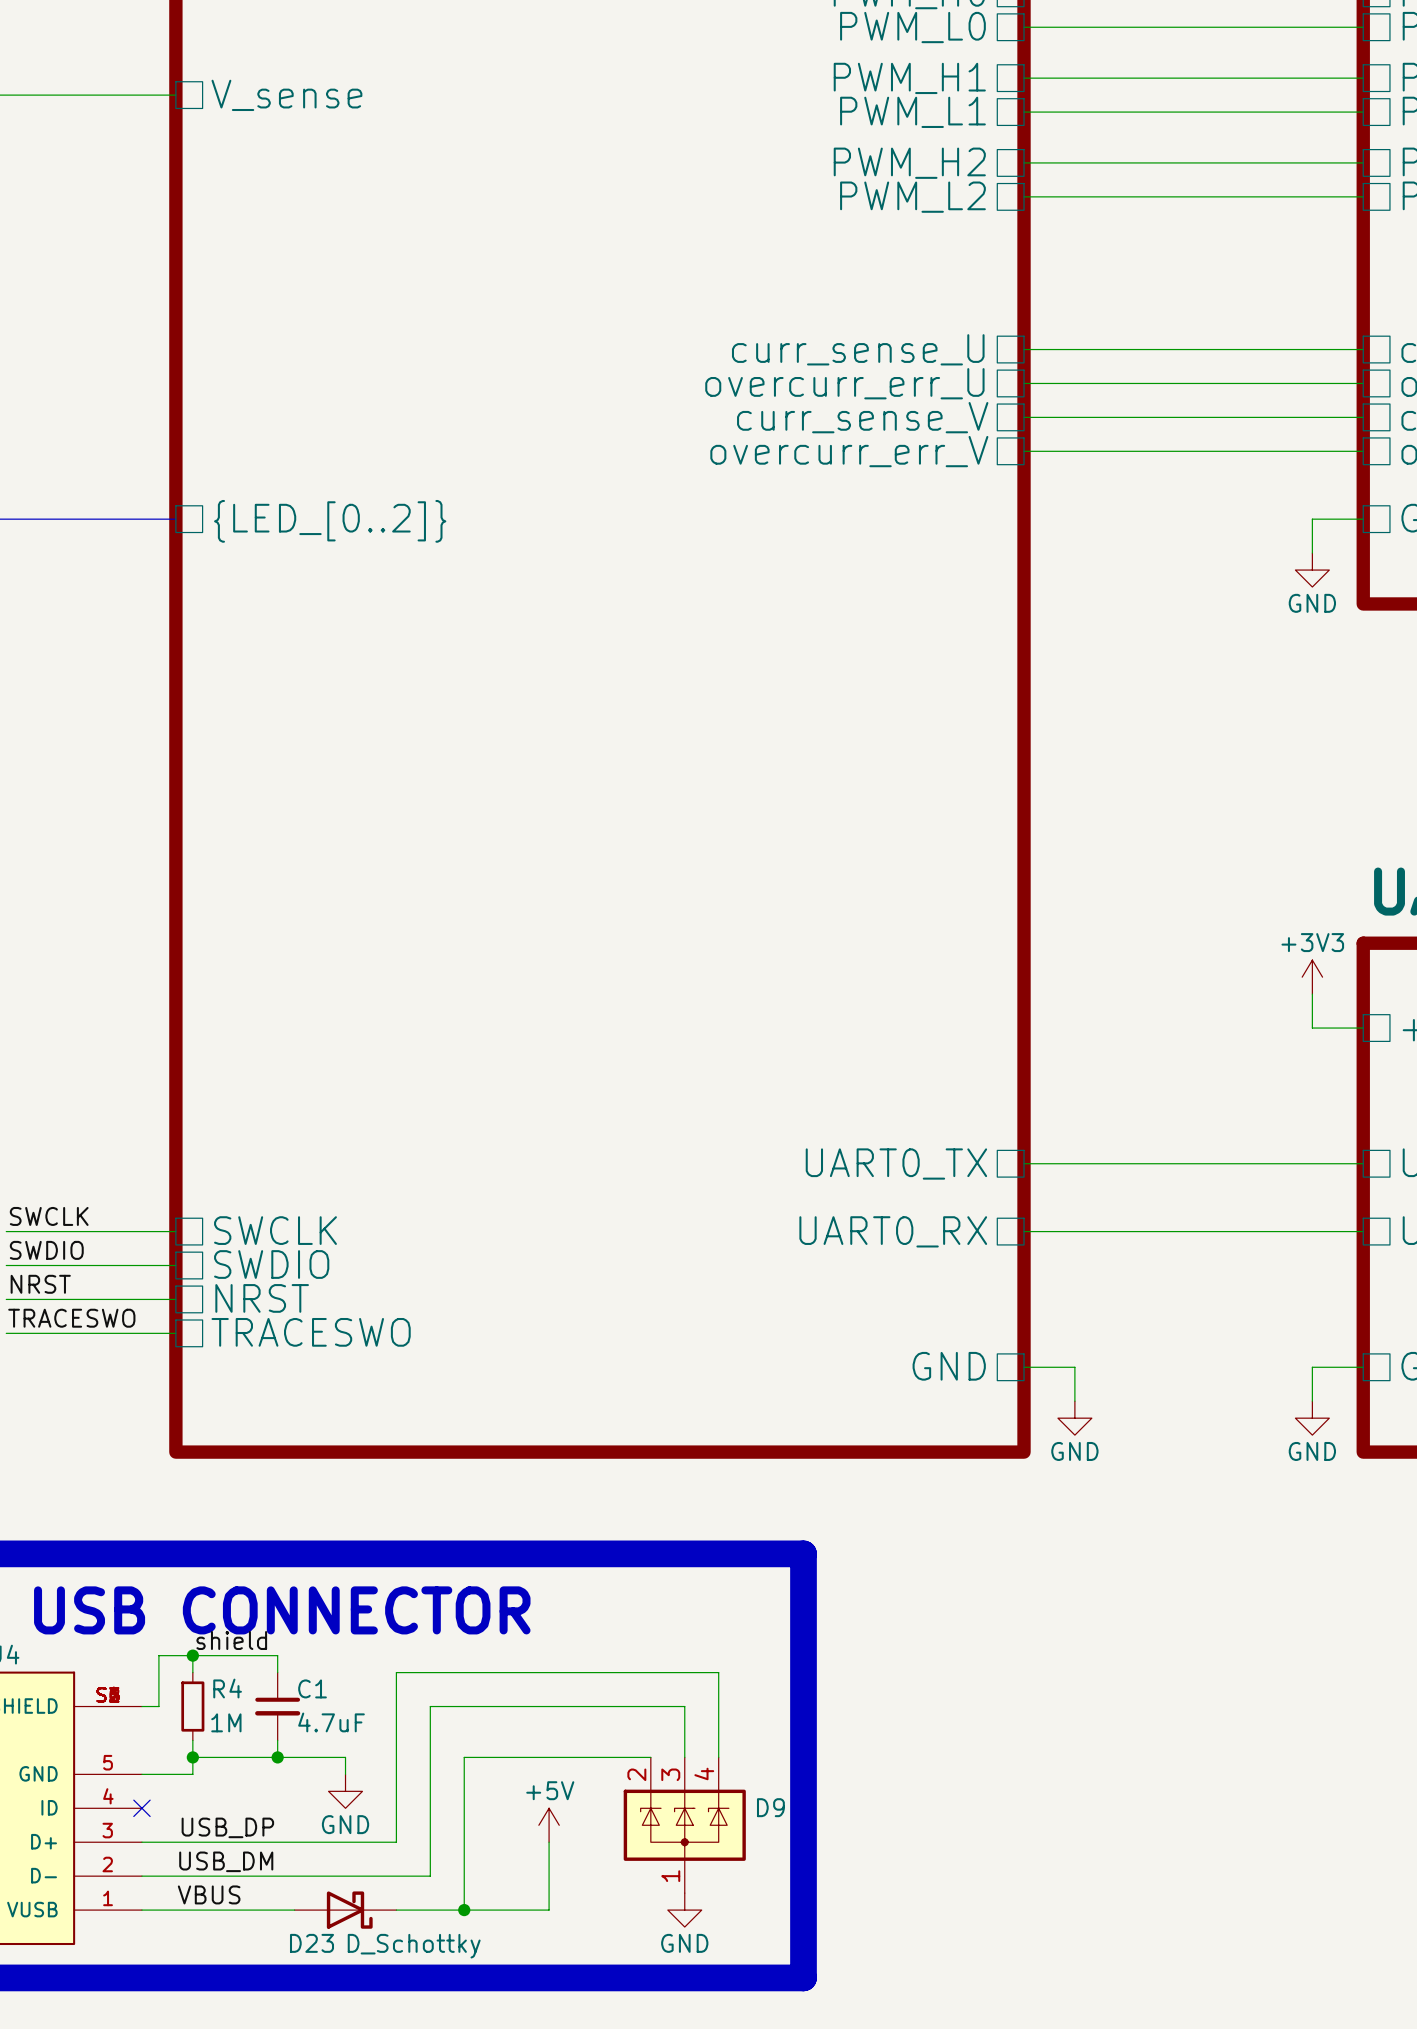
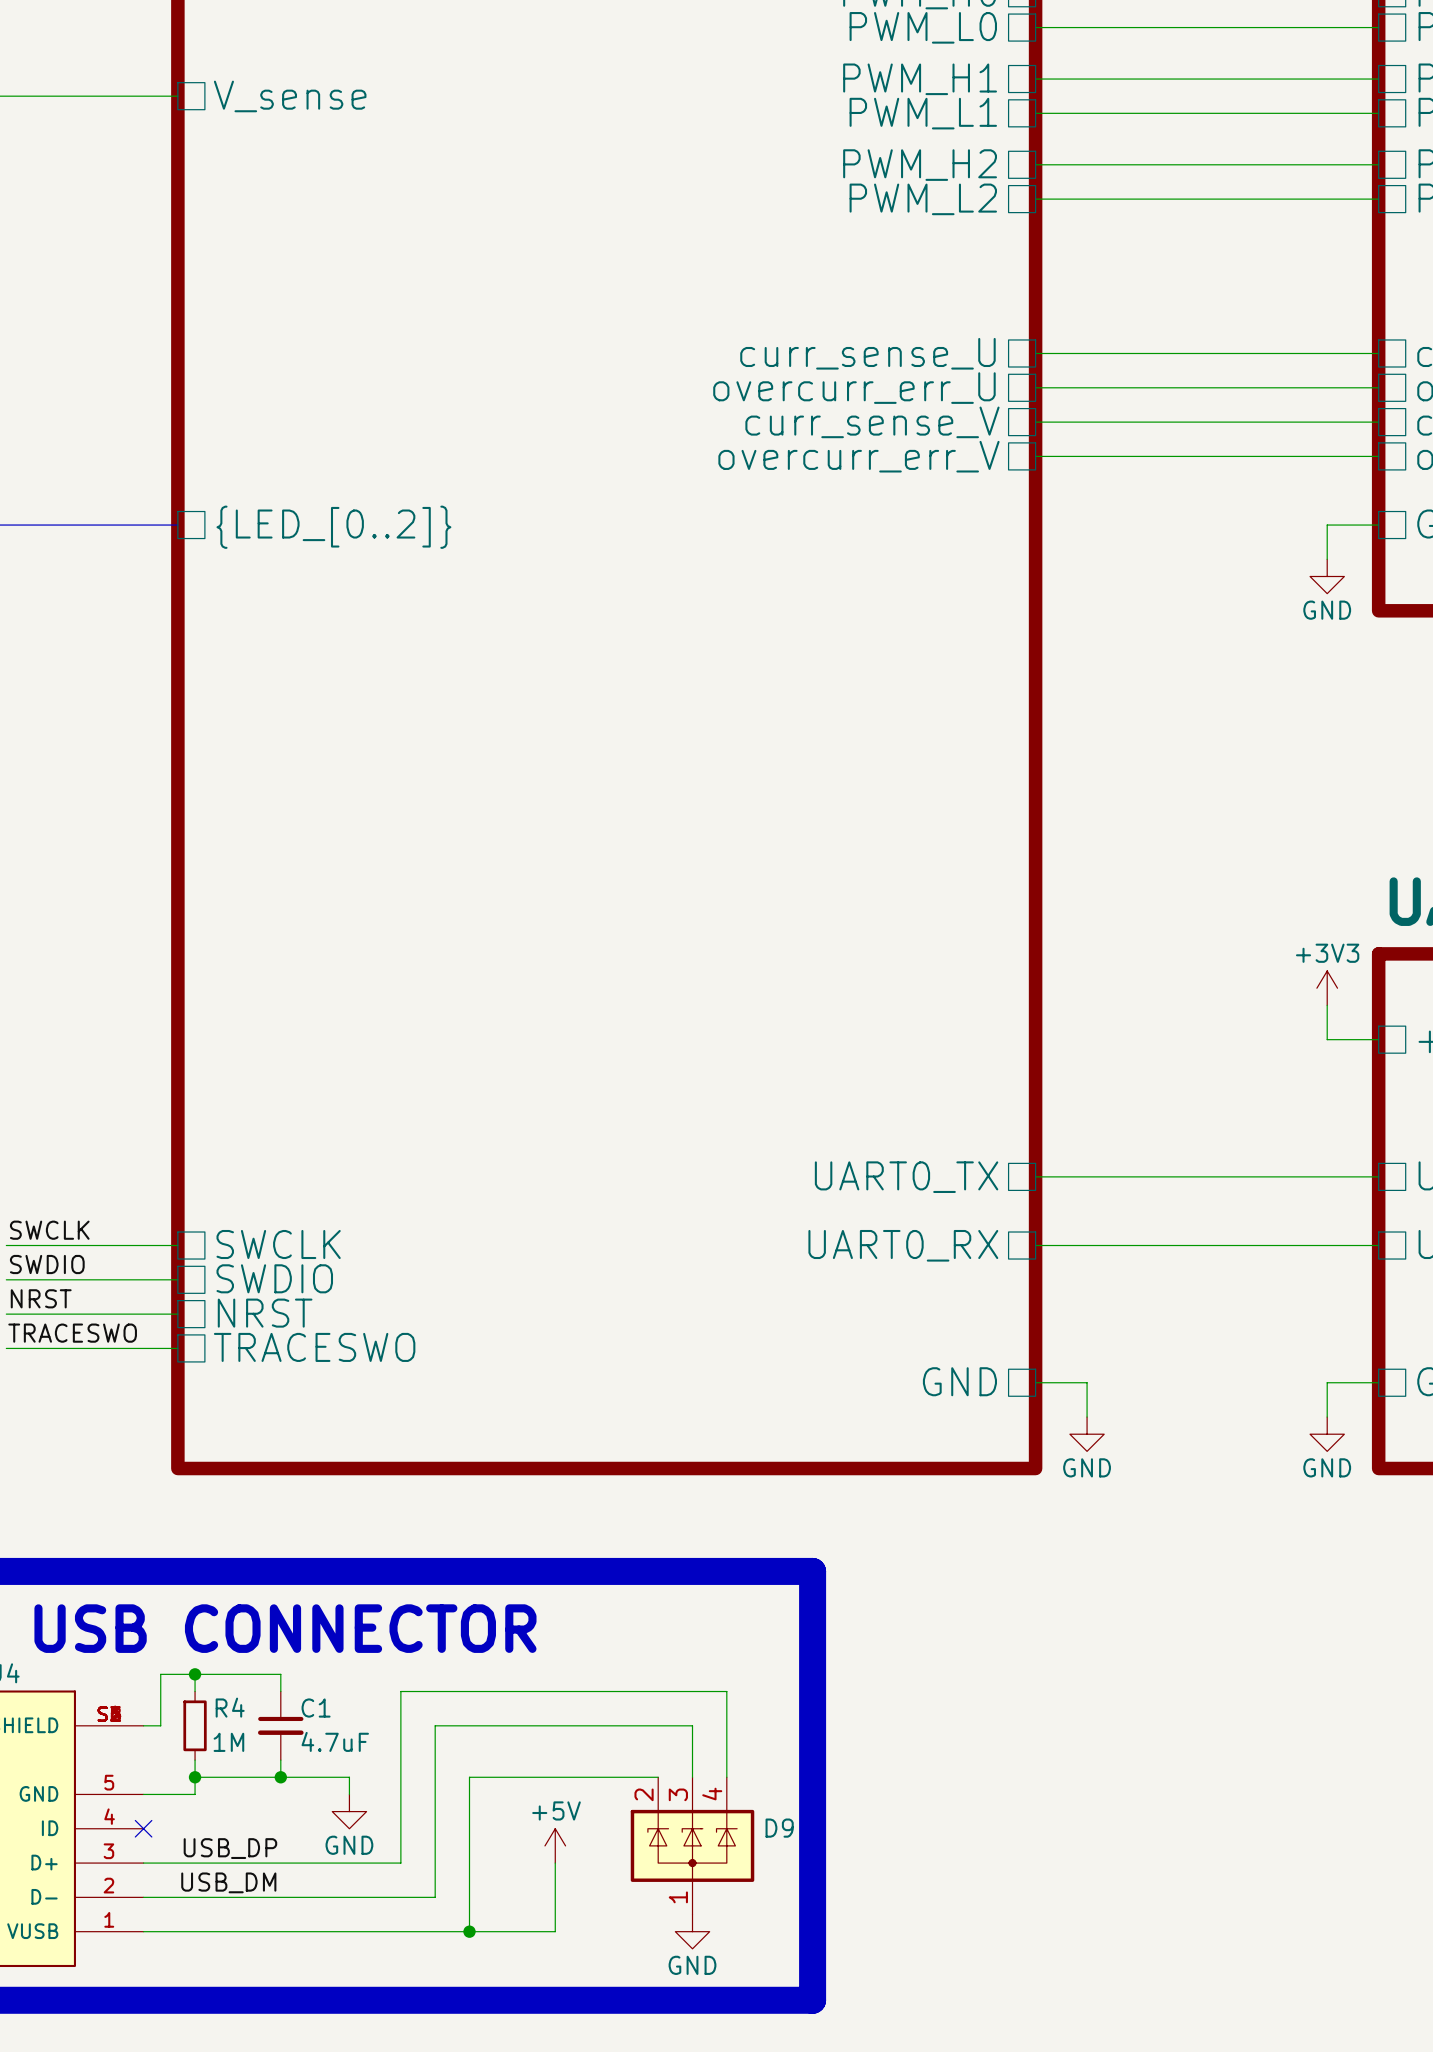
label: shield (231, 1640) -> none
label: VBUS (209, 1894) -> none
D23: D_Schottky (345, 1910) -> none

